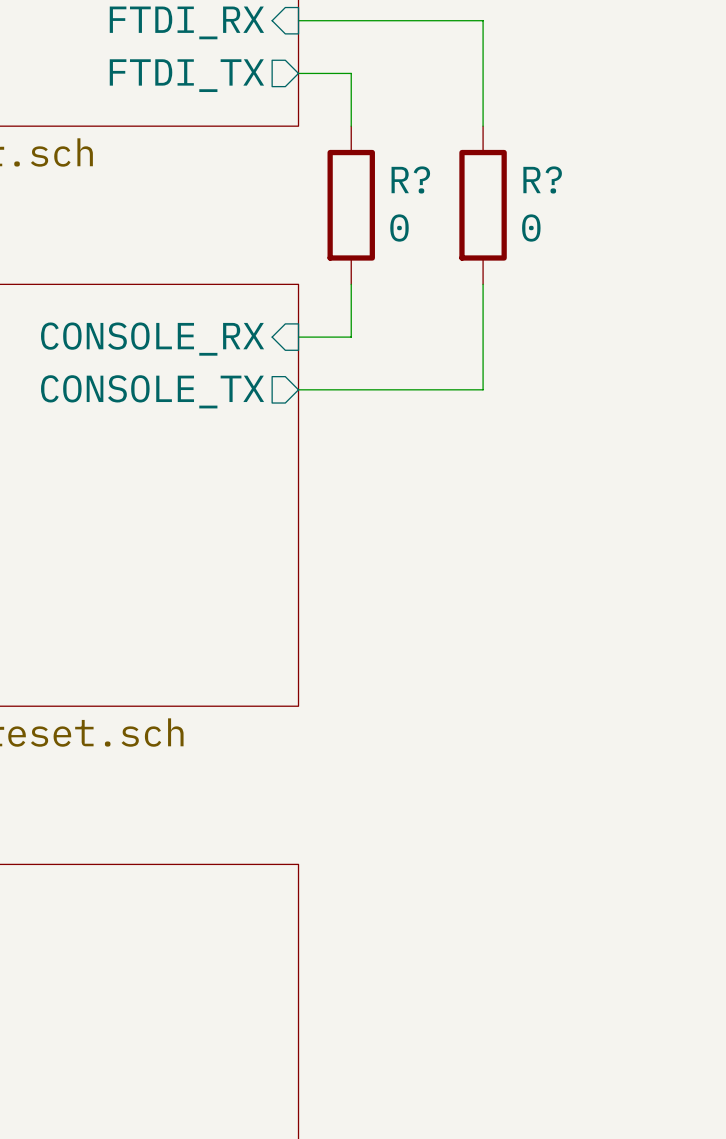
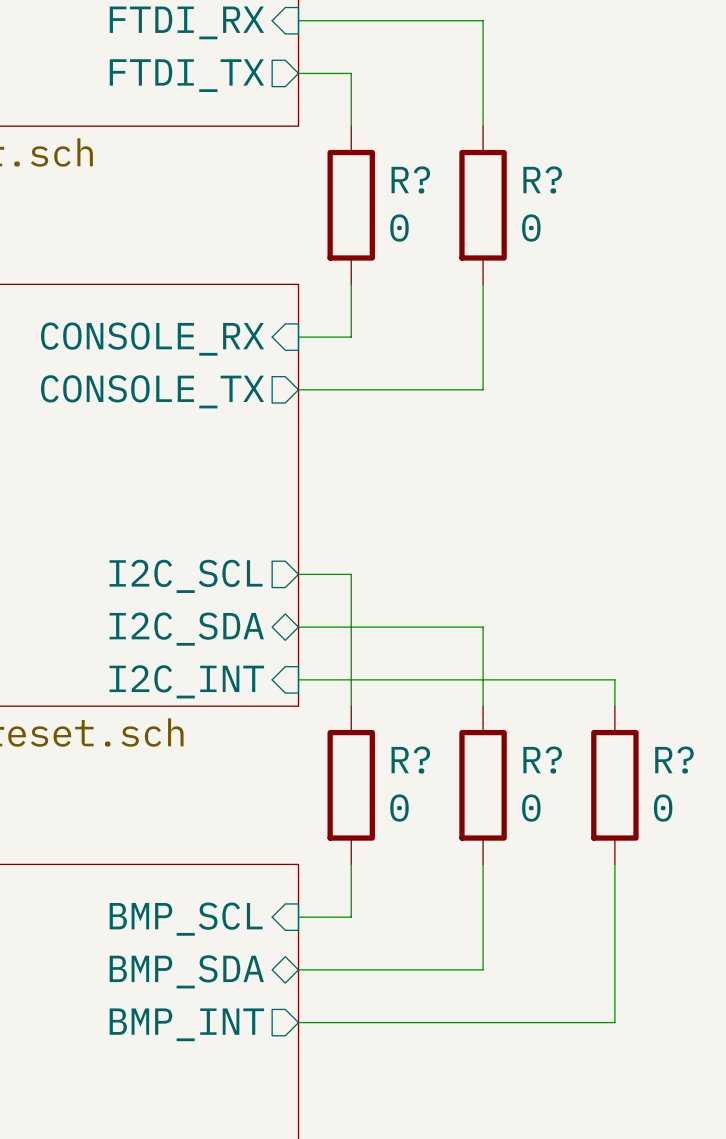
wire: none -> (298, 574) (351, 574) (351, 706)
sheet pin: none -> I2C_SCL (186, 576)
wire: none -> (298, 627) (483, 627) (483, 706)
sheet pin: none -> I2C_SDA (186, 629)
wire: none -> (298, 679) (614, 679) (614, 706)
sheet pin: none -> I2C_INT (186, 681)
R?: none -> 0 (351, 785)
R?: none -> 0 (483, 785)
R?: none -> 0 (614, 785)
wire: none -> (351, 864) (351, 917) (298, 917)
wire: none -> (483, 864) (483, 969) (298, 969)
wire: none -> (614, 864) (614, 1022) (298, 1022)
sheet pin: none -> BMP_SCL (186, 919)
sheet pin: none -> BMP_SDA (186, 971)
sheet pin: none -> BMP_INT (186, 1024)

